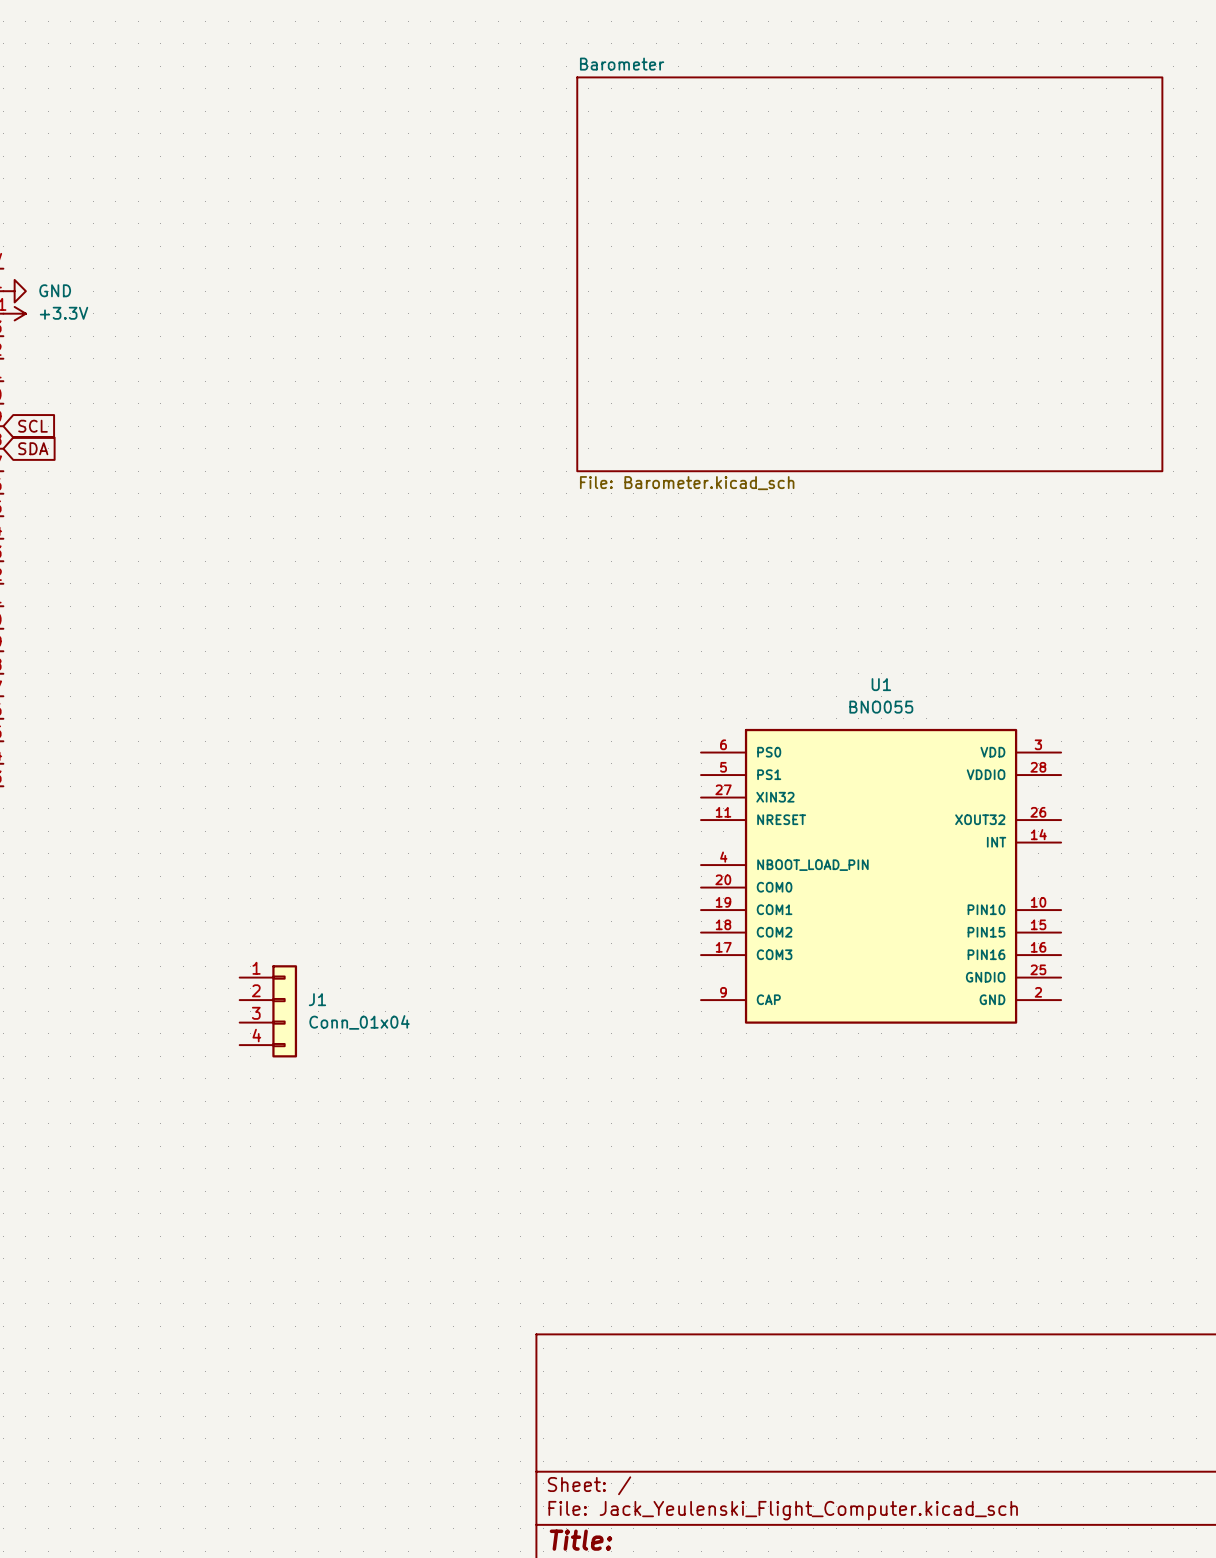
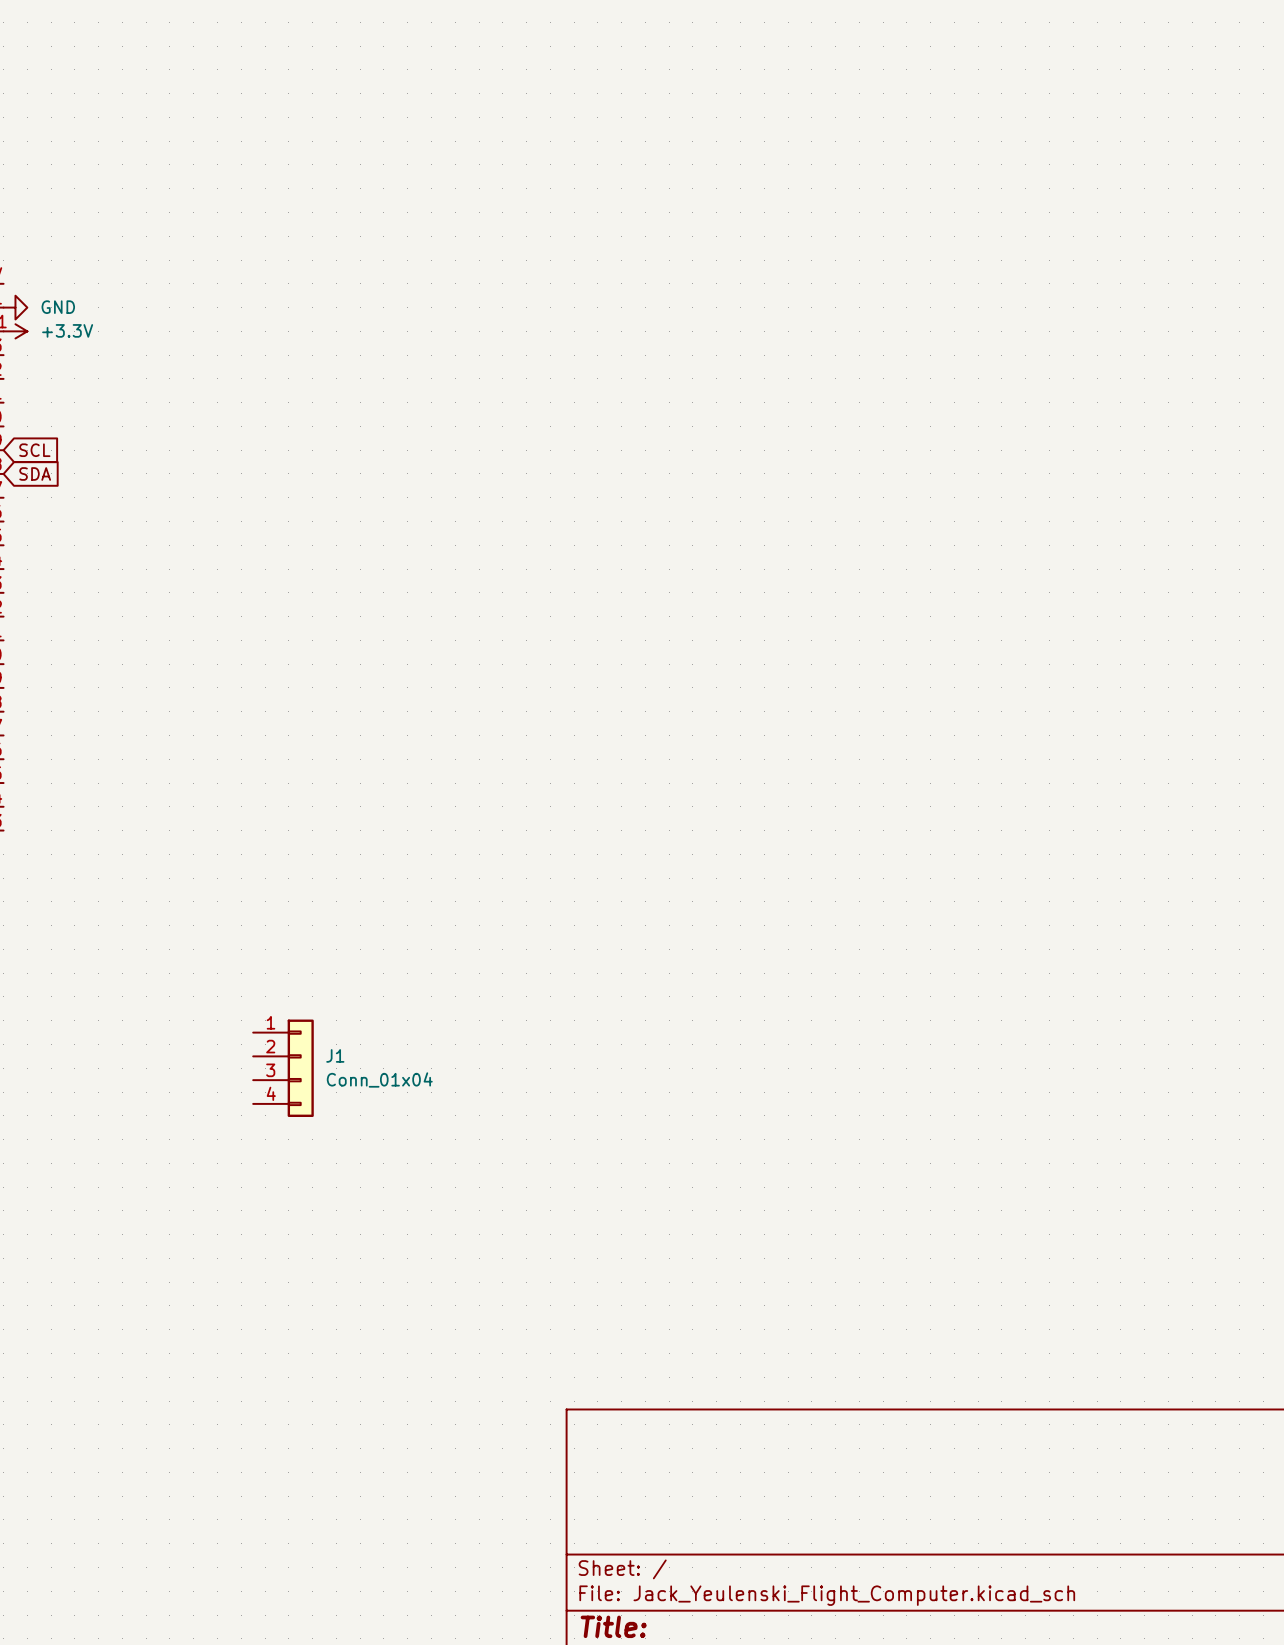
sheet Barometer: File: Barometer.kicad_sch (869, 274) -> none
U1: BNO055 (881, 876) -> none

